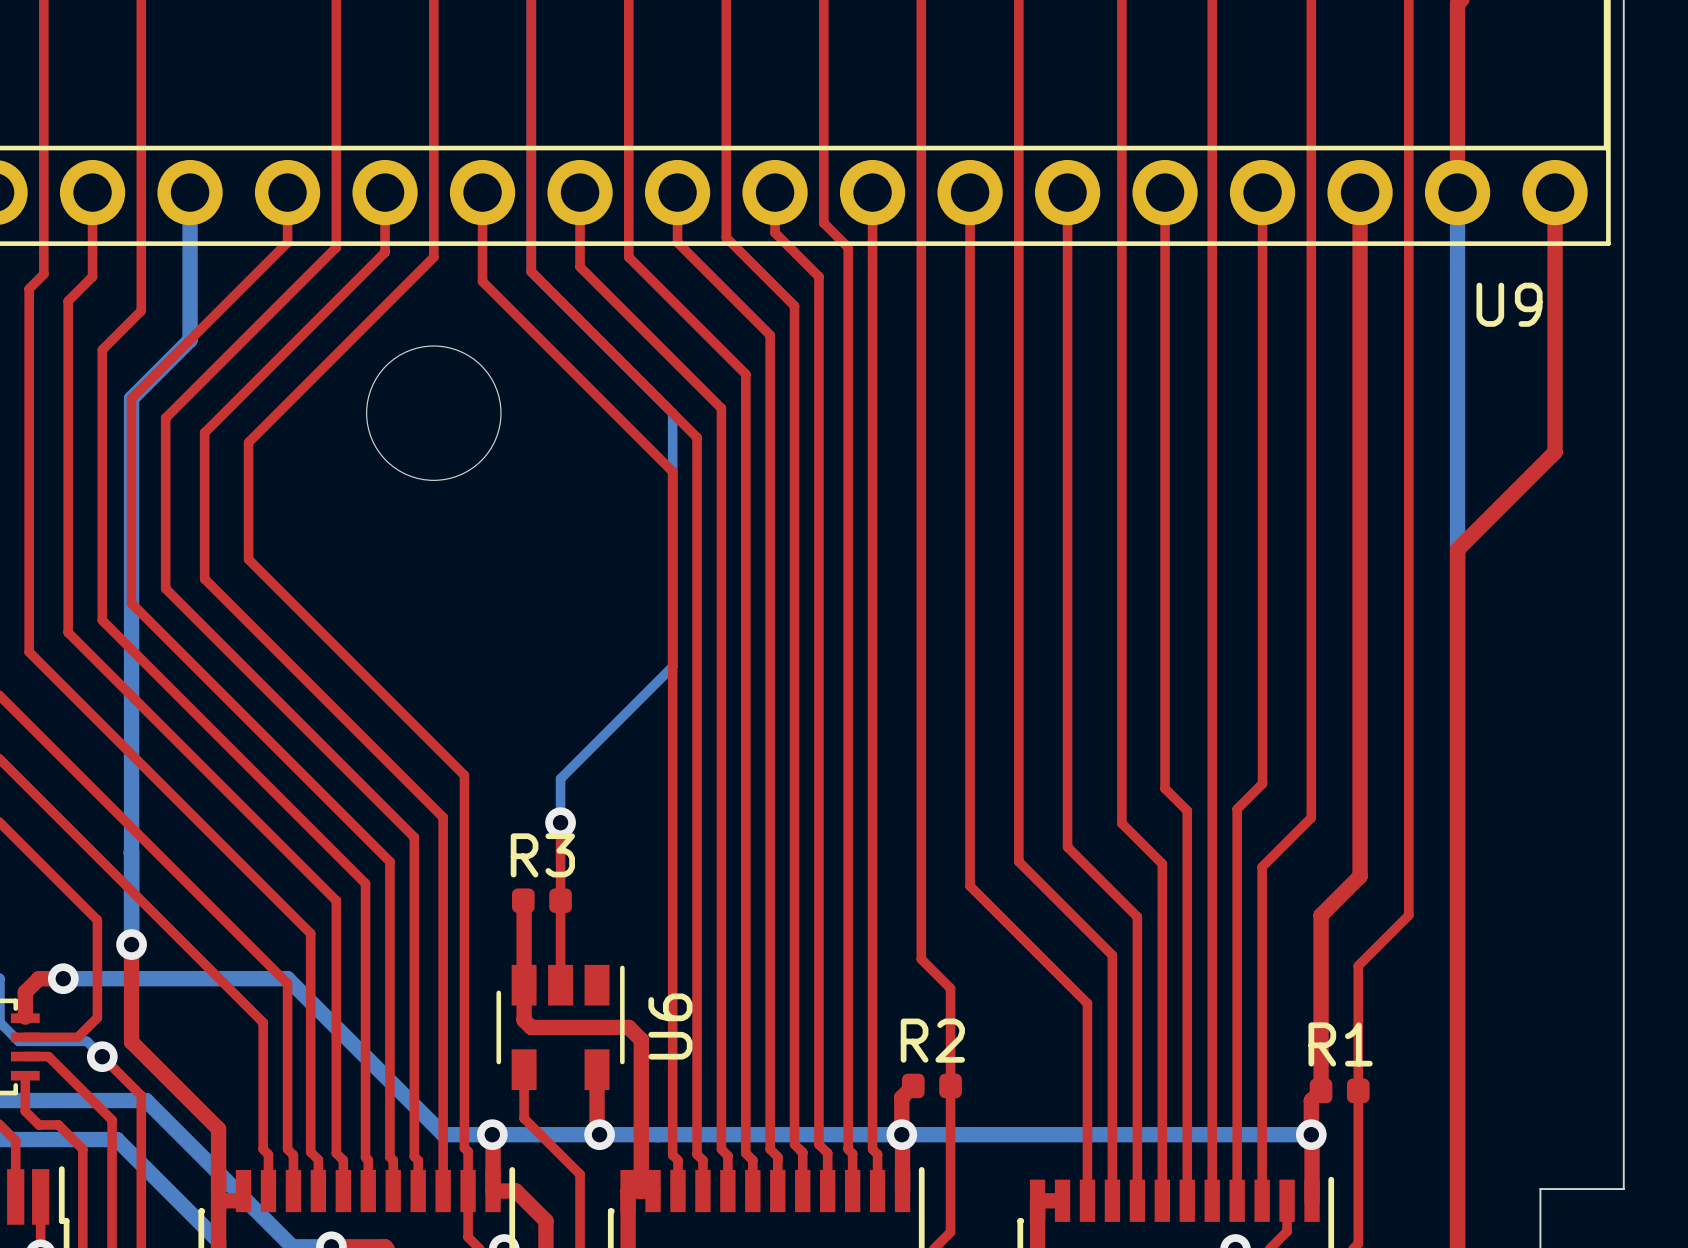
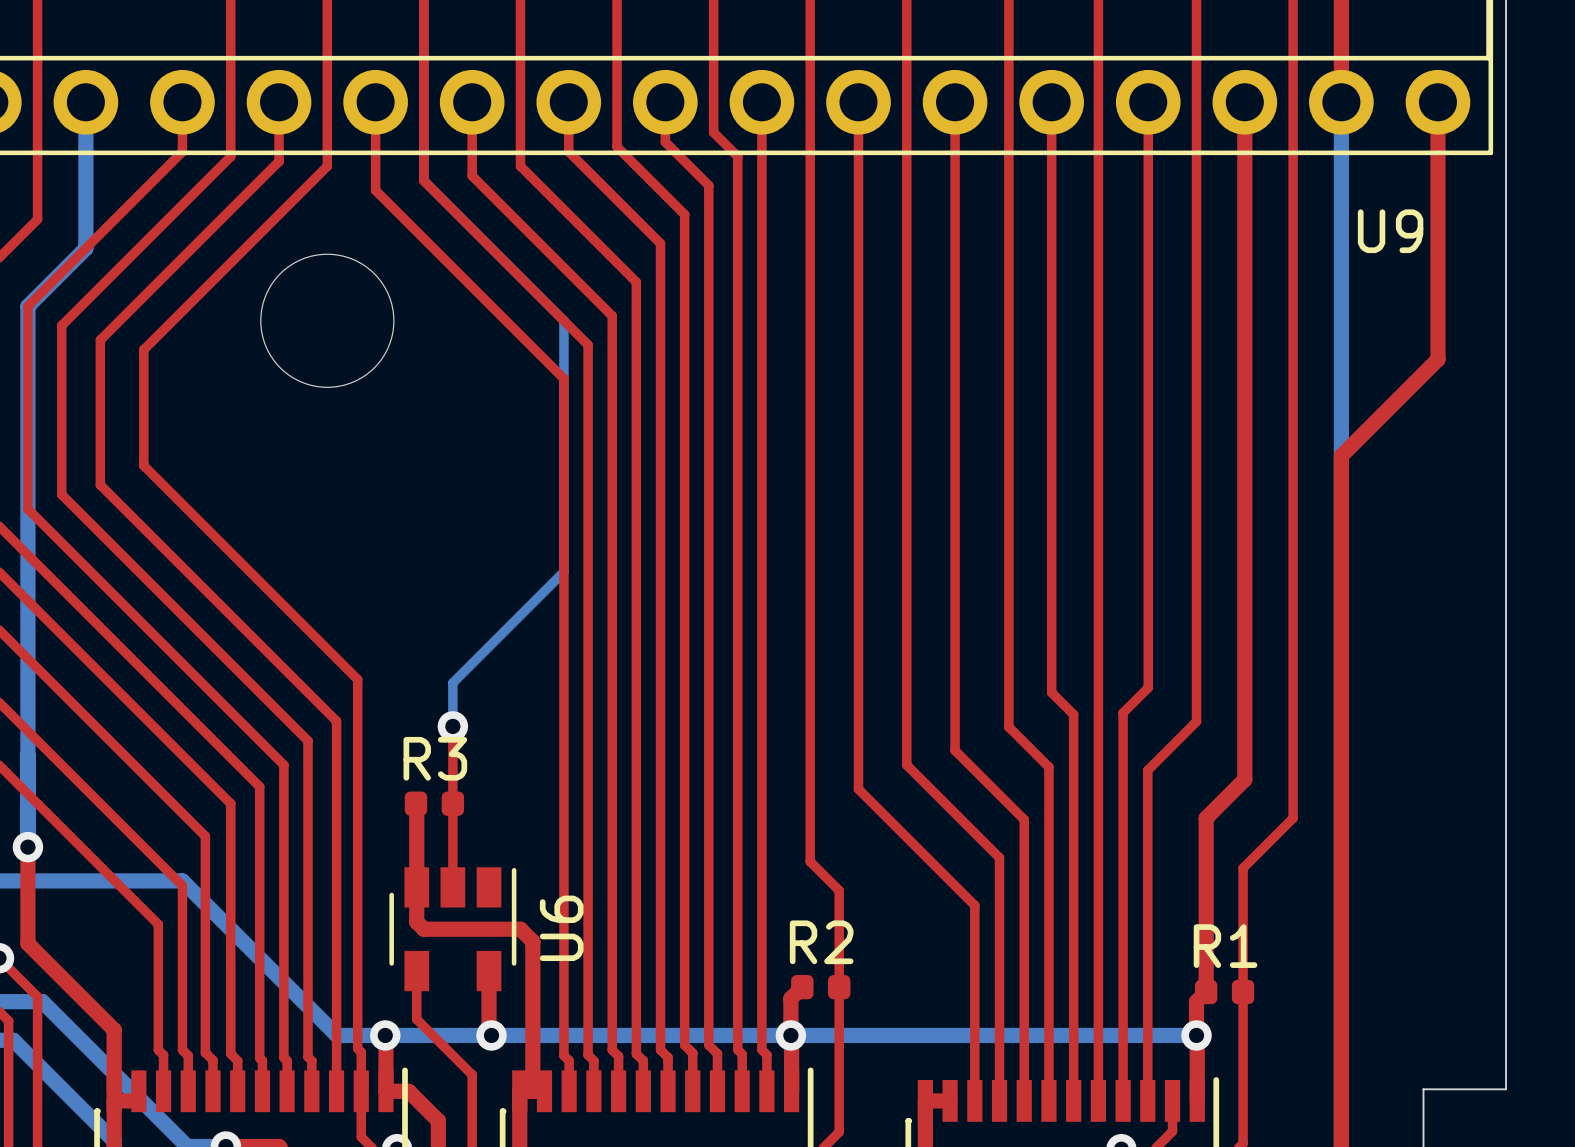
U9 name position: U9 (1509, 304) -> U9 (1390, 231)

